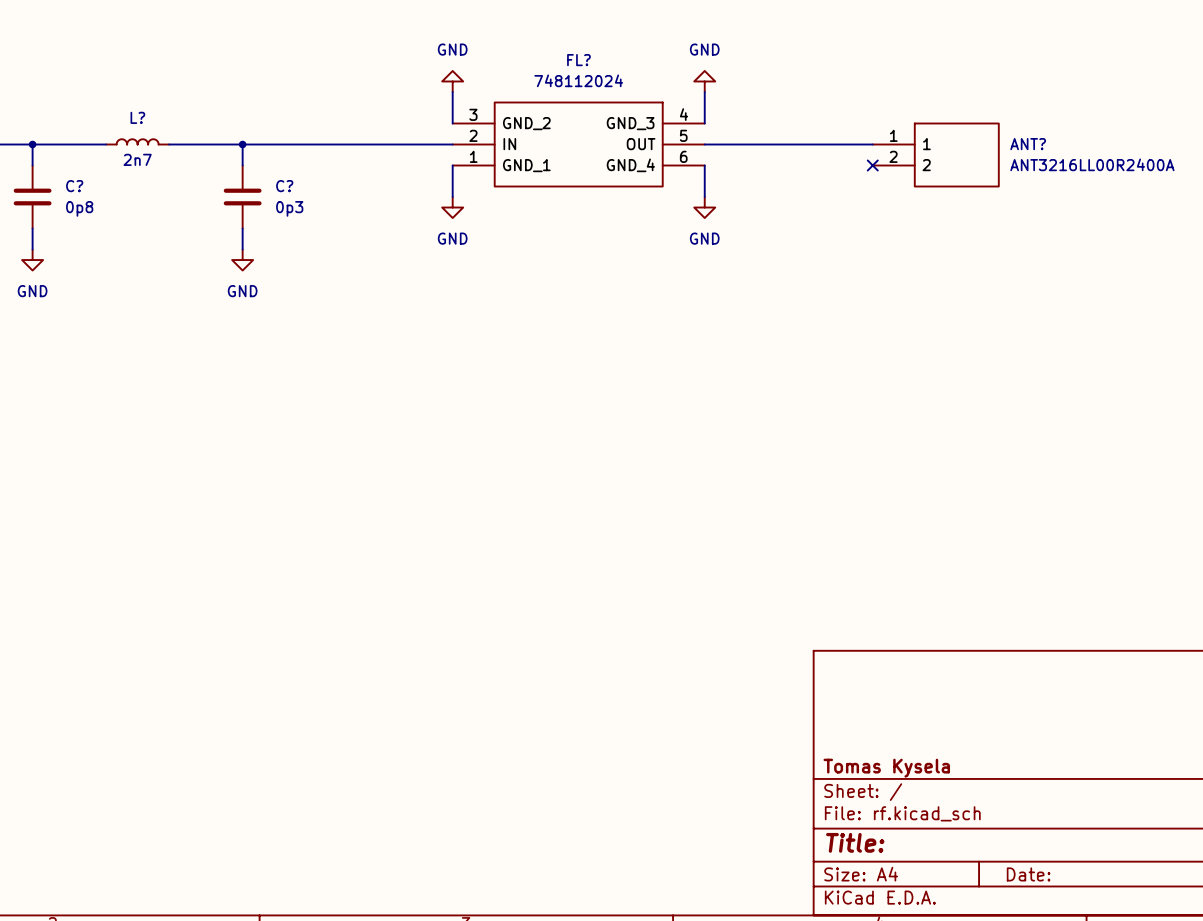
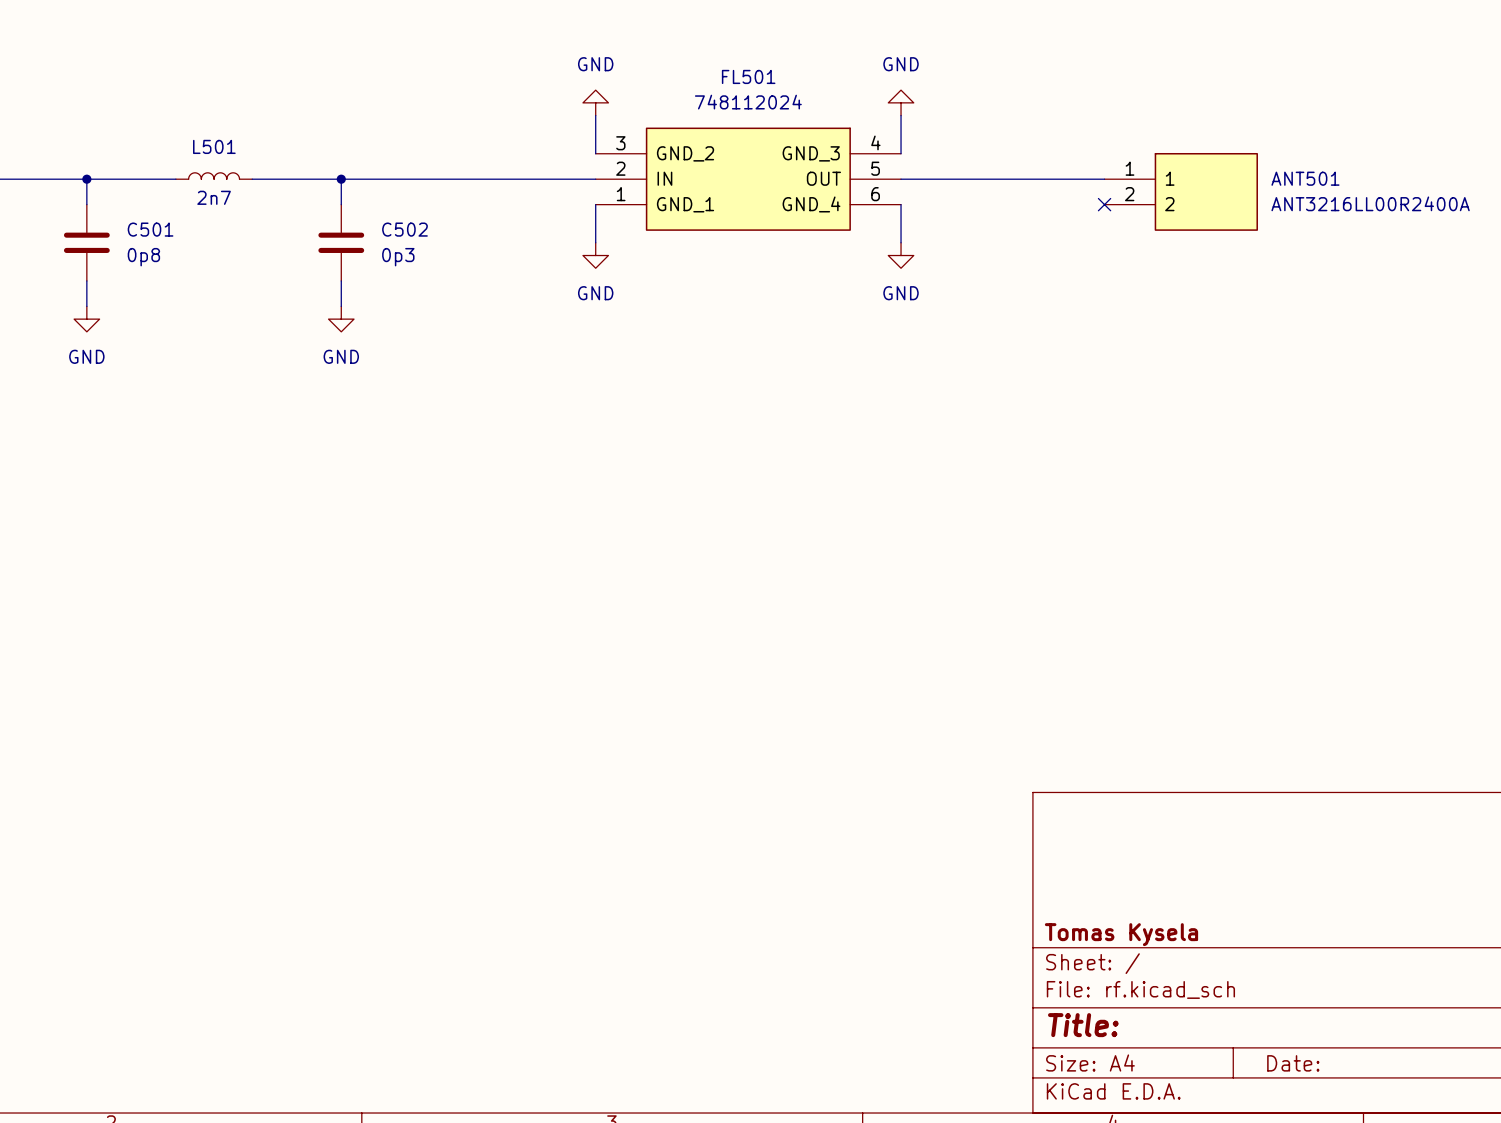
L? name: L? (137, 117) -> L501 (214, 146)
FL?: 748112024 (578, 144) -> none
FL501: none -> 748112024 (748, 179)
ANT?: ANT3216LL00R2400A (936, 155) -> none
ANT501: none -> ANT3216LL00R2400A (1181, 191)
C? name: C? (74, 186) -> C501 (150, 229)
C? name: C? (284, 186) -> C502 (404, 229)

